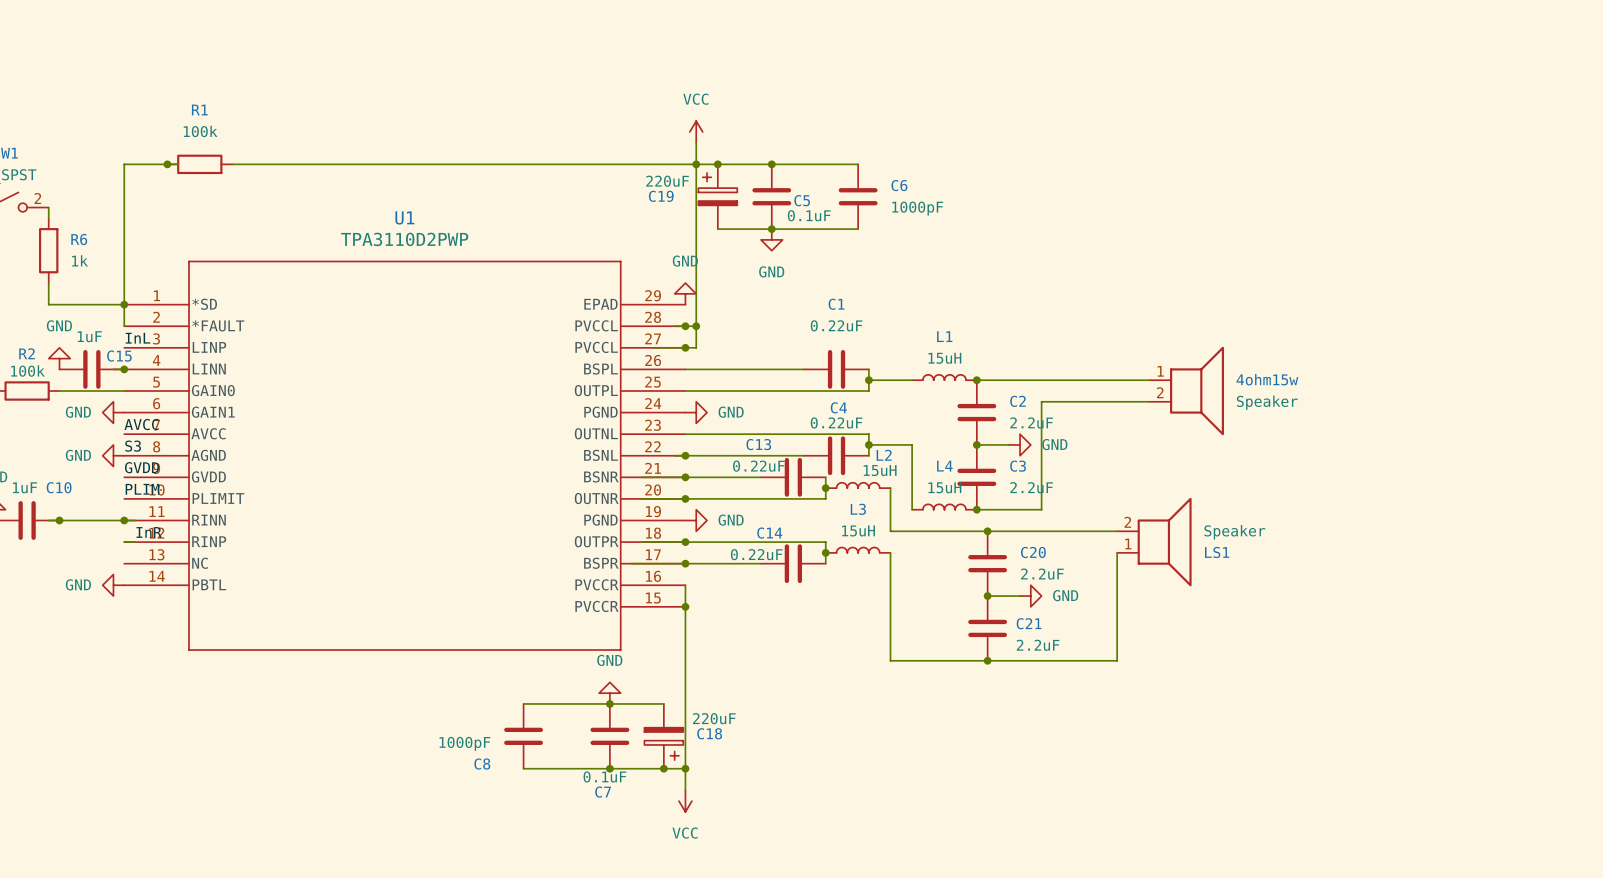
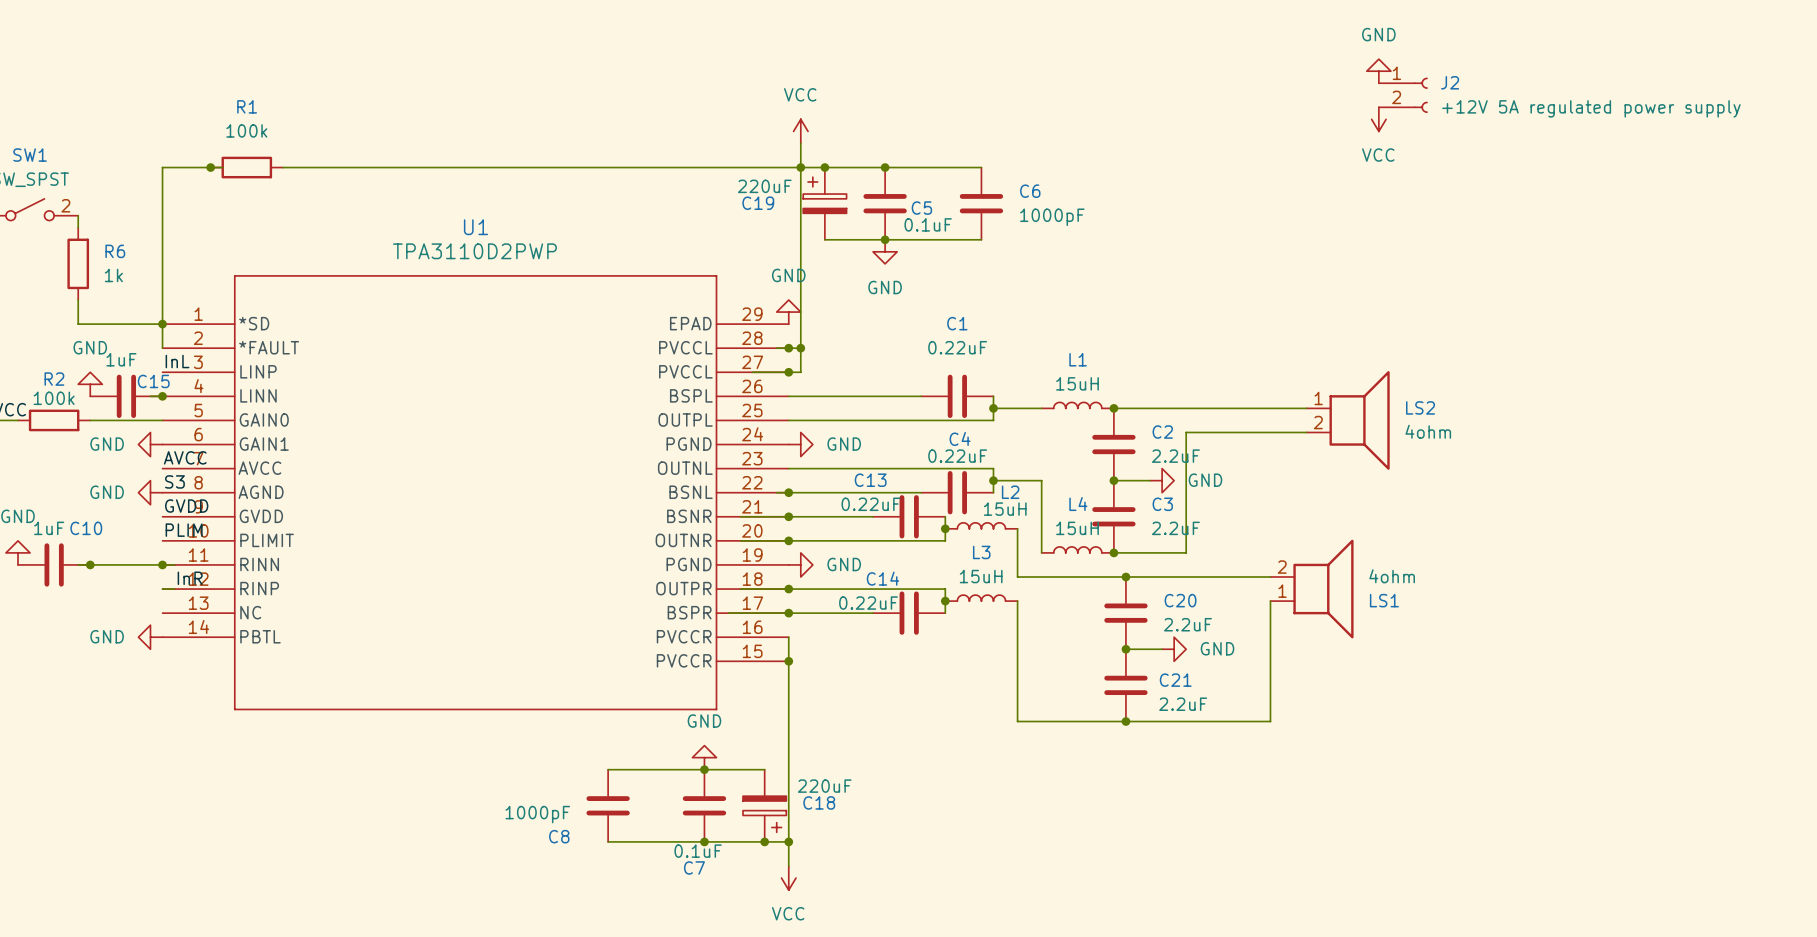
power symbol: none -> GND (1378, 71)
J2: none -> +12V 5A regulated power supply (1403, 95)
power symbol: none -> VCC (1378, 119)
4ohm15w name: 4ohm15w (1267, 379) -> LS2 (1420, 407)
4ohm15w value: Speaker (1267, 402) -> 4ohm (1428, 431)
LS1 value: Speaker (1234, 532) -> 4ohm (1392, 576)

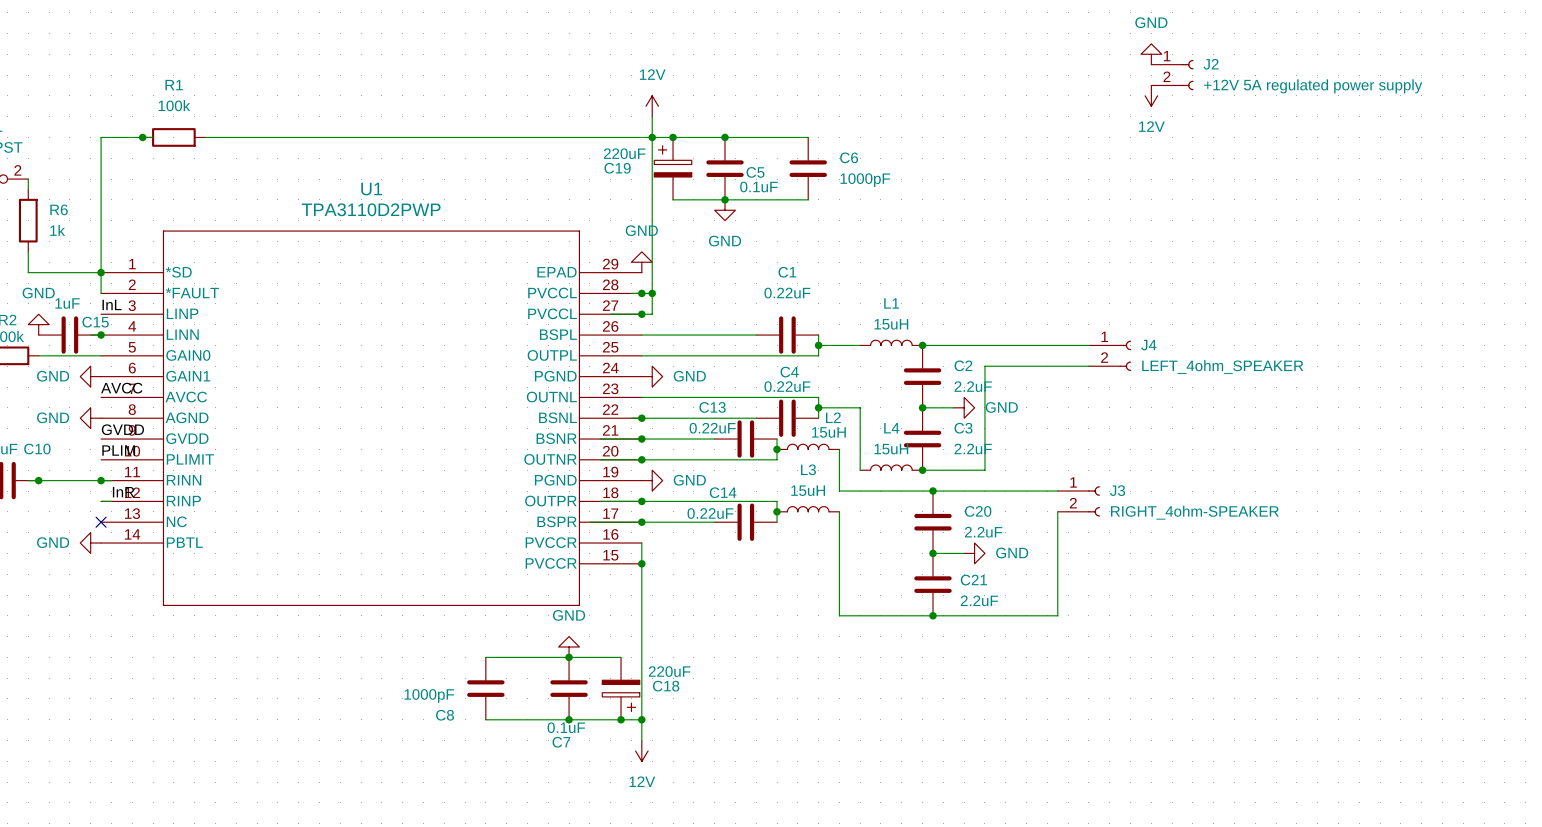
power symbol: VCC (1378, 119) -> 12V (1151, 95)
power symbol: VCC (800, 131) -> 12V (652, 106)
J4: none -> LEFT_4ohm_SPEAKER (1110, 355)
LS2: 4ohm (1348, 420) -> none
label: S3 (174, 481) -> none
J3: none -> RIGHT_4ohm-SPEAKER (1078, 501)
LS1: 4ohm (1312, 589) -> none
no-connect mark: none -> (101, 522)
power symbol: VCC (788, 878) -> 12V (641, 750)

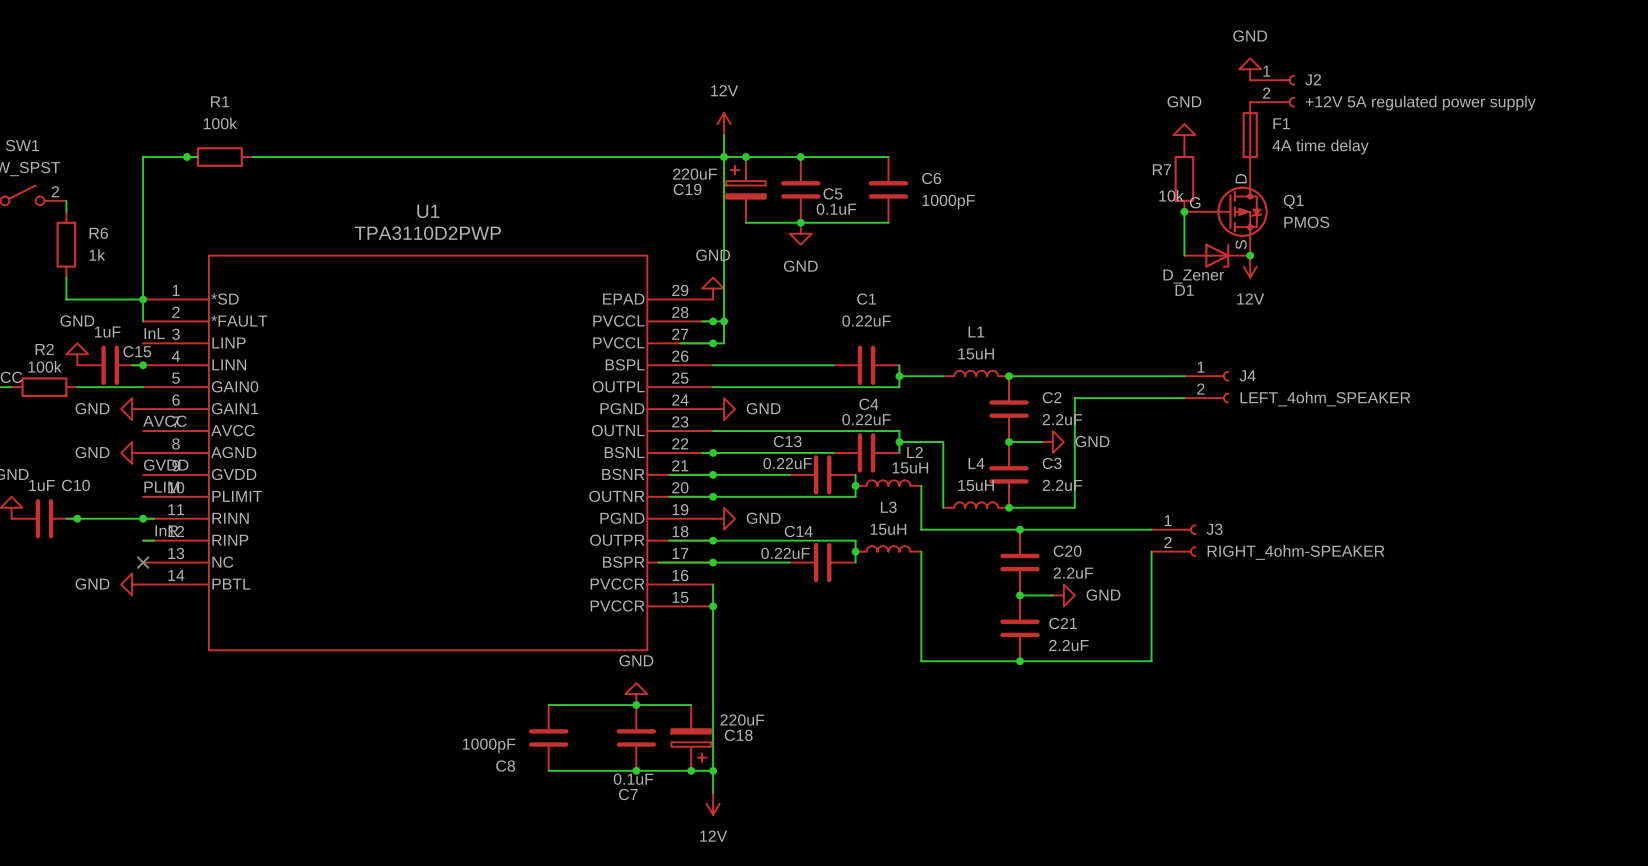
power symbol position: 12V (1151, 95) -> 12V (1250, 266)
power symbol: none -> GND (1184, 135)
F1: none -> 4A time delay (1250, 135)
R7: none -> 10k (1184, 178)
wire: none -> (1184, 211) (1184, 255)
junction: none -> (1184, 211)
Q1: none -> PMOS (1226, 211)
D1: none -> D_Zener (1217, 255)
junction: none -> (1250, 255)

